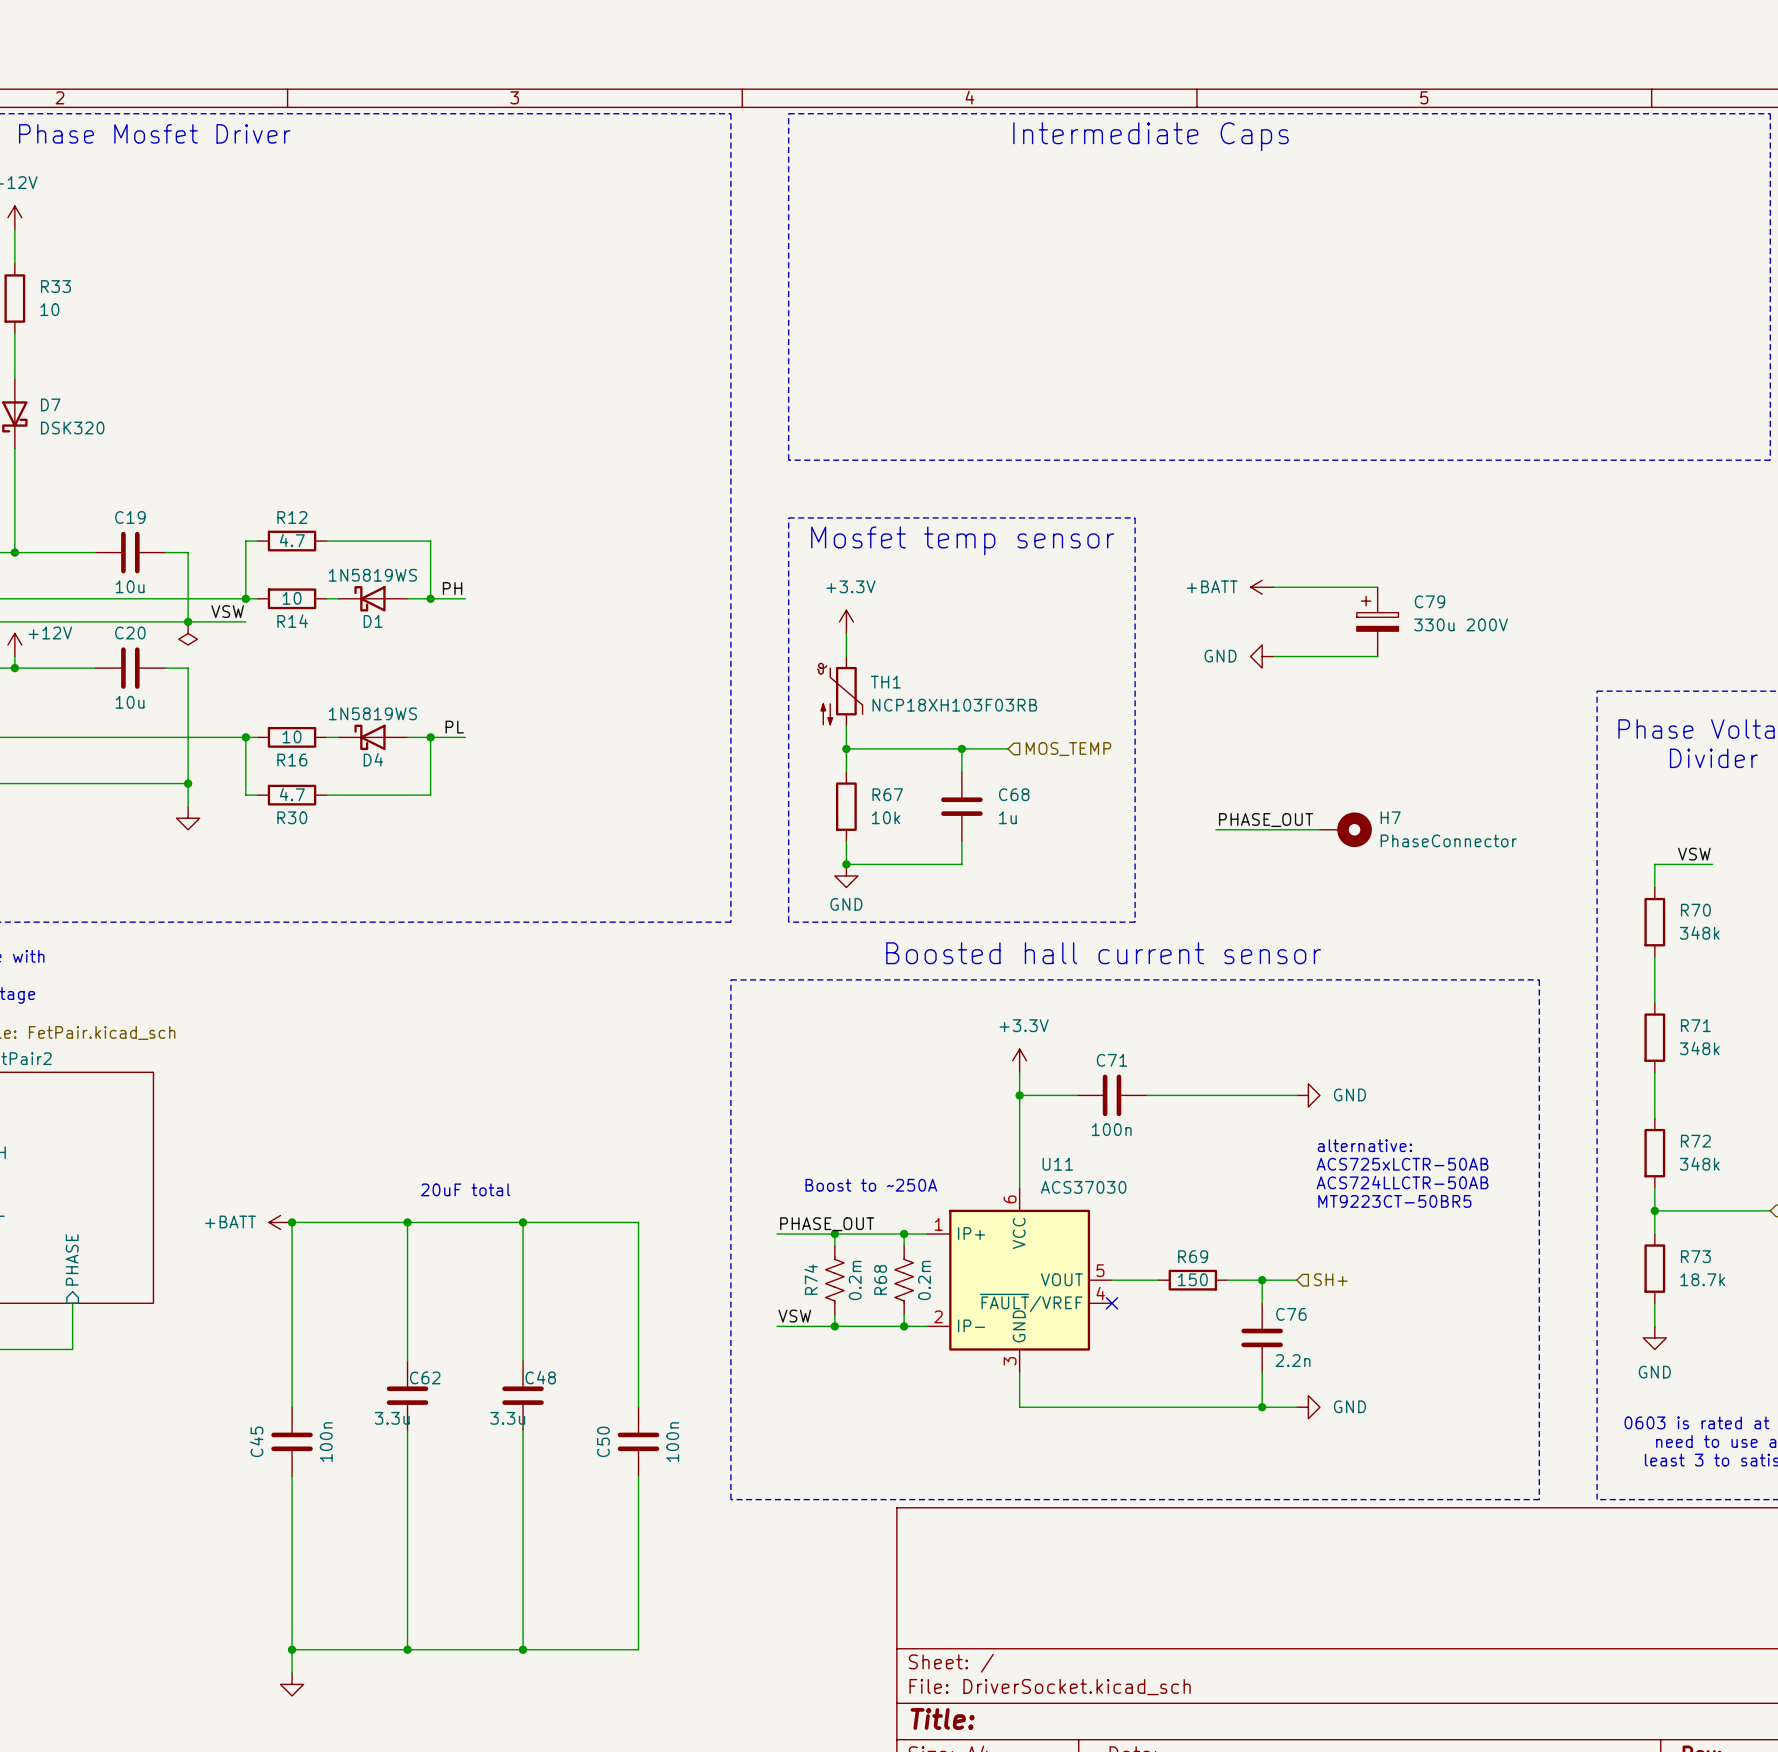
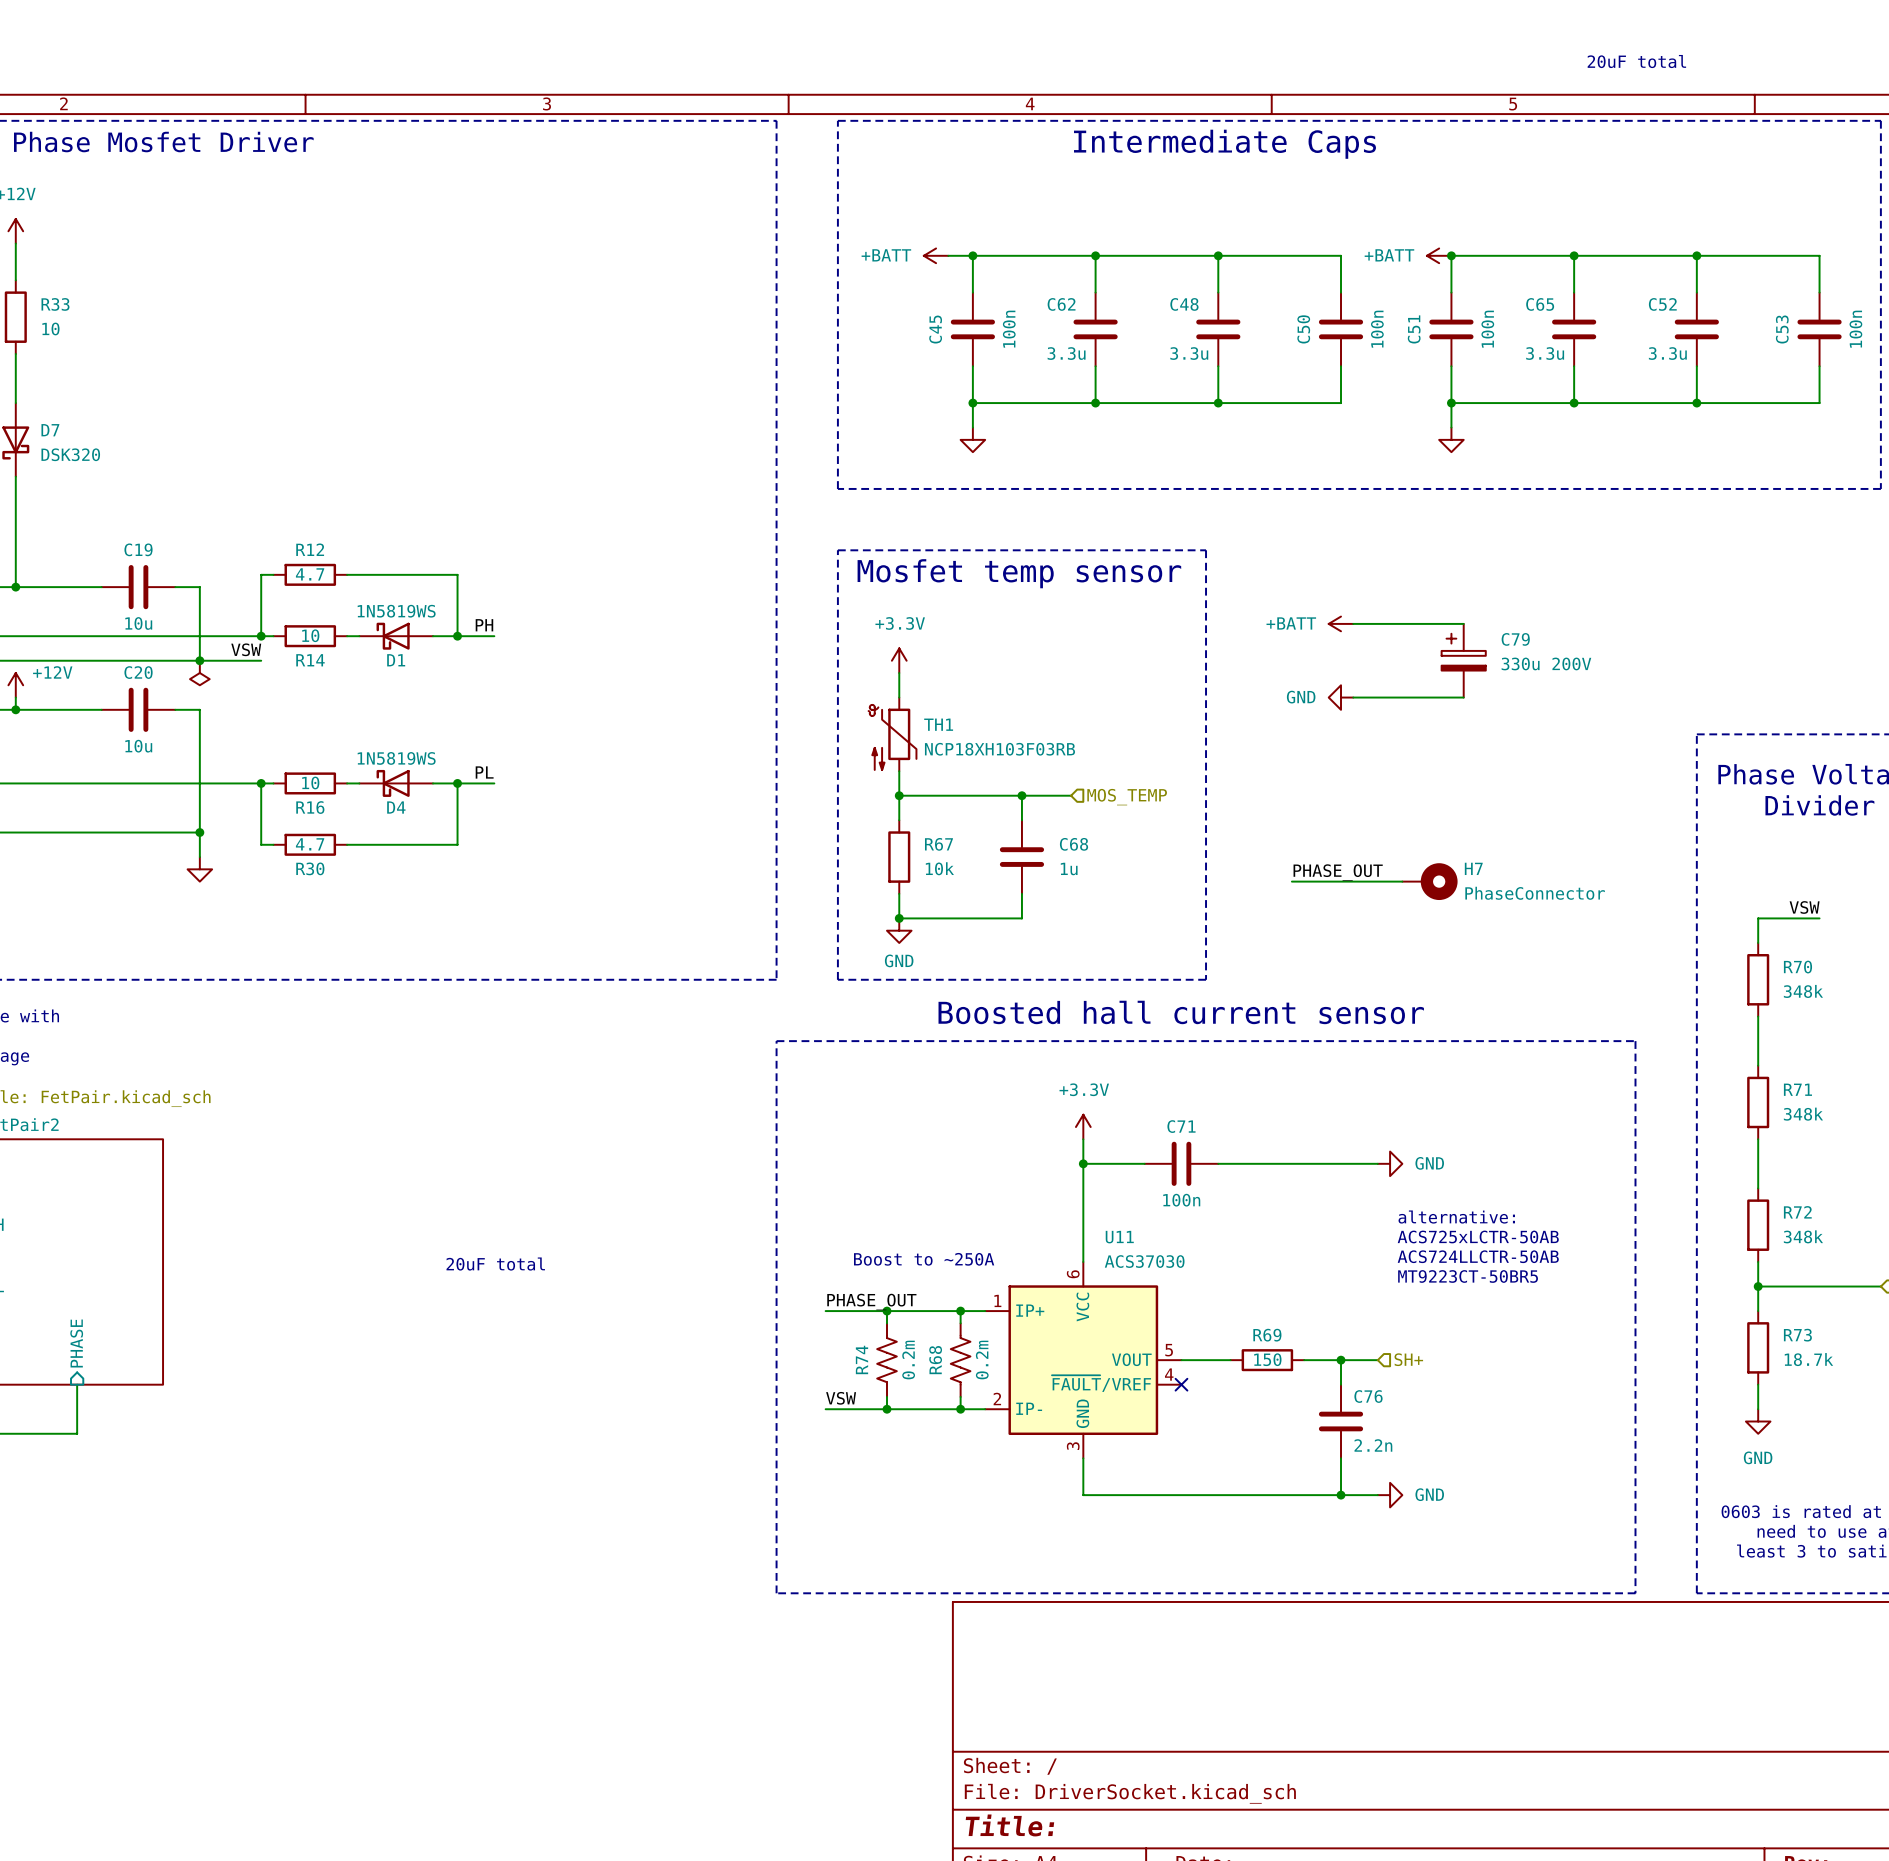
text: none -> 20uF total (1636, 61)
power symbol: none -> +BATT (936, 255)
wire: none -> (948, 255) (1341, 255) (1341, 292)
wire: none -> (972, 255) (972, 292)
junction: none -> (972, 255)
wire: none -> (1095, 255) (1095, 292)
junction: none -> (1095, 255)
wire: none -> (1218, 255) (1218, 292)
junction: none -> (1218, 255)
power symbol: none -> +BATT (1439, 255)
junction: none -> (1451, 255)
wire: none -> (1574, 255) (1574, 292)
junction: none -> (1574, 255)
wire: none -> (1696, 255) (1696, 292)
junction: none -> (1696, 255)
wire: none -> (1451, 292) (1451, 255) (1819, 255) (1819, 292)
C51: none -> 100n (1451, 329)
C65: none -> 3.3u (1574, 329)
C52: none -> 3.3u (1696, 329)
C53: none -> 100n (1819, 329)
wire: none -> (972, 366) (972, 427)
wire: none -> (1095, 366) (1095, 403)
wire: none -> (1218, 366) (1218, 403)
wire: none -> (1341, 366) (1341, 403) (972, 403)
wire: none -> (1451, 366) (1451, 427)
wire: none -> (1574, 366) (1574, 403)
wire: none -> (1696, 366) (1696, 403)
wire: none -> (1819, 366) (1819, 403) (1451, 403)
junction: none -> (972, 403)
junction: none -> (1095, 403)
junction: none -> (1218, 403)
junction: none -> (1451, 403)
junction: none -> (1574, 403)
junction: none -> (1696, 403)
power symbol: none -> (972, 439)
power symbol: none -> (1451, 439)
power symbol: +BATT (280, 1222) -> none
junction: (292, 1222) -> none
wire: (407, 1222) (407, 1361) -> none
junction: (407, 1222) -> none
wire: (523, 1222) (523, 1361) -> none
junction: (523, 1222) -> none
C62 name position: C62 (425, 1377) -> C62 (1061, 304)
C48 name position: C48 (540, 1377) -> C48 (1184, 304)
C62 position: (407, 1395) -> (1095, 329)
C48 position: (523, 1395) -> (1218, 329)
wire: (292, 1407) (292, 1222) (638, 1222) (638, 1407) -> none
C62 value position: 3.3u (392, 1418) -> 3.3u (1066, 353)
C48 value position: 3.3u (507, 1418) -> 3.3u (1189, 353)
wire: (407, 1430) (407, 1649) -> none
wire: (523, 1430) (523, 1649) -> none
C45 position: (292, 1441) -> (972, 329)
C50 position: (638, 1441) -> (1341, 329)
wire: (292, 1476) (292, 1672) -> none
wire: (638, 1476) (638, 1649) (292, 1649) -> none
junction: (292, 1649) -> none
junction: (407, 1649) -> none
junction: (523, 1649) -> none
power symbol: (292, 1684) -> none

